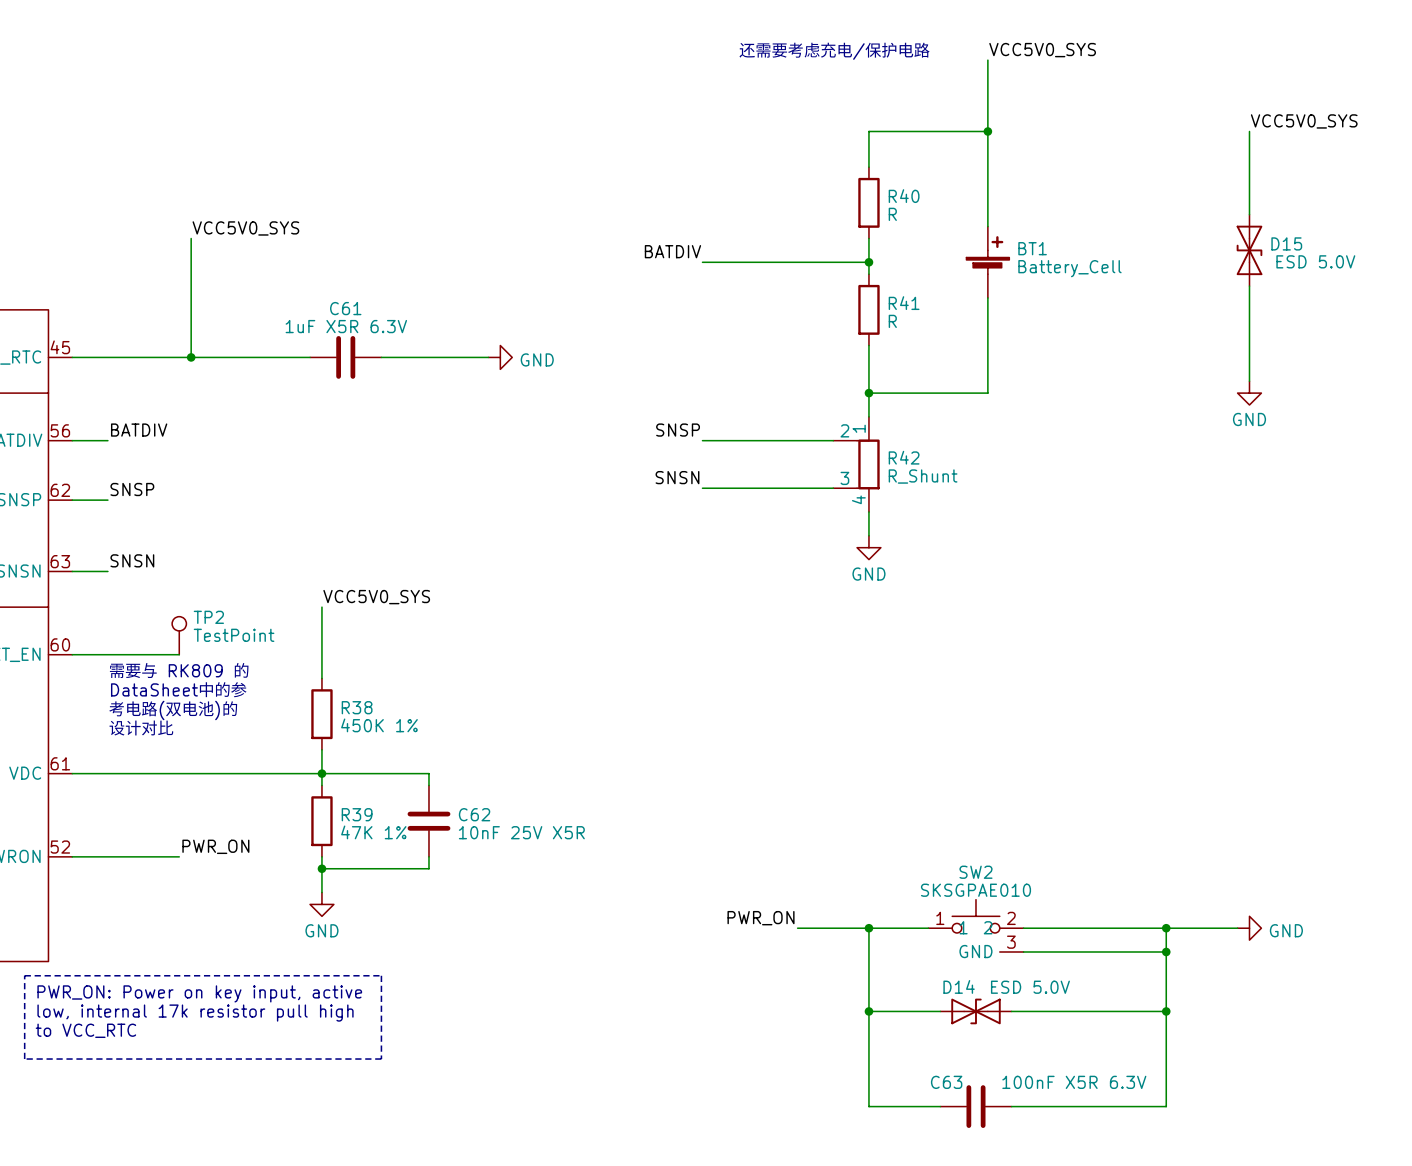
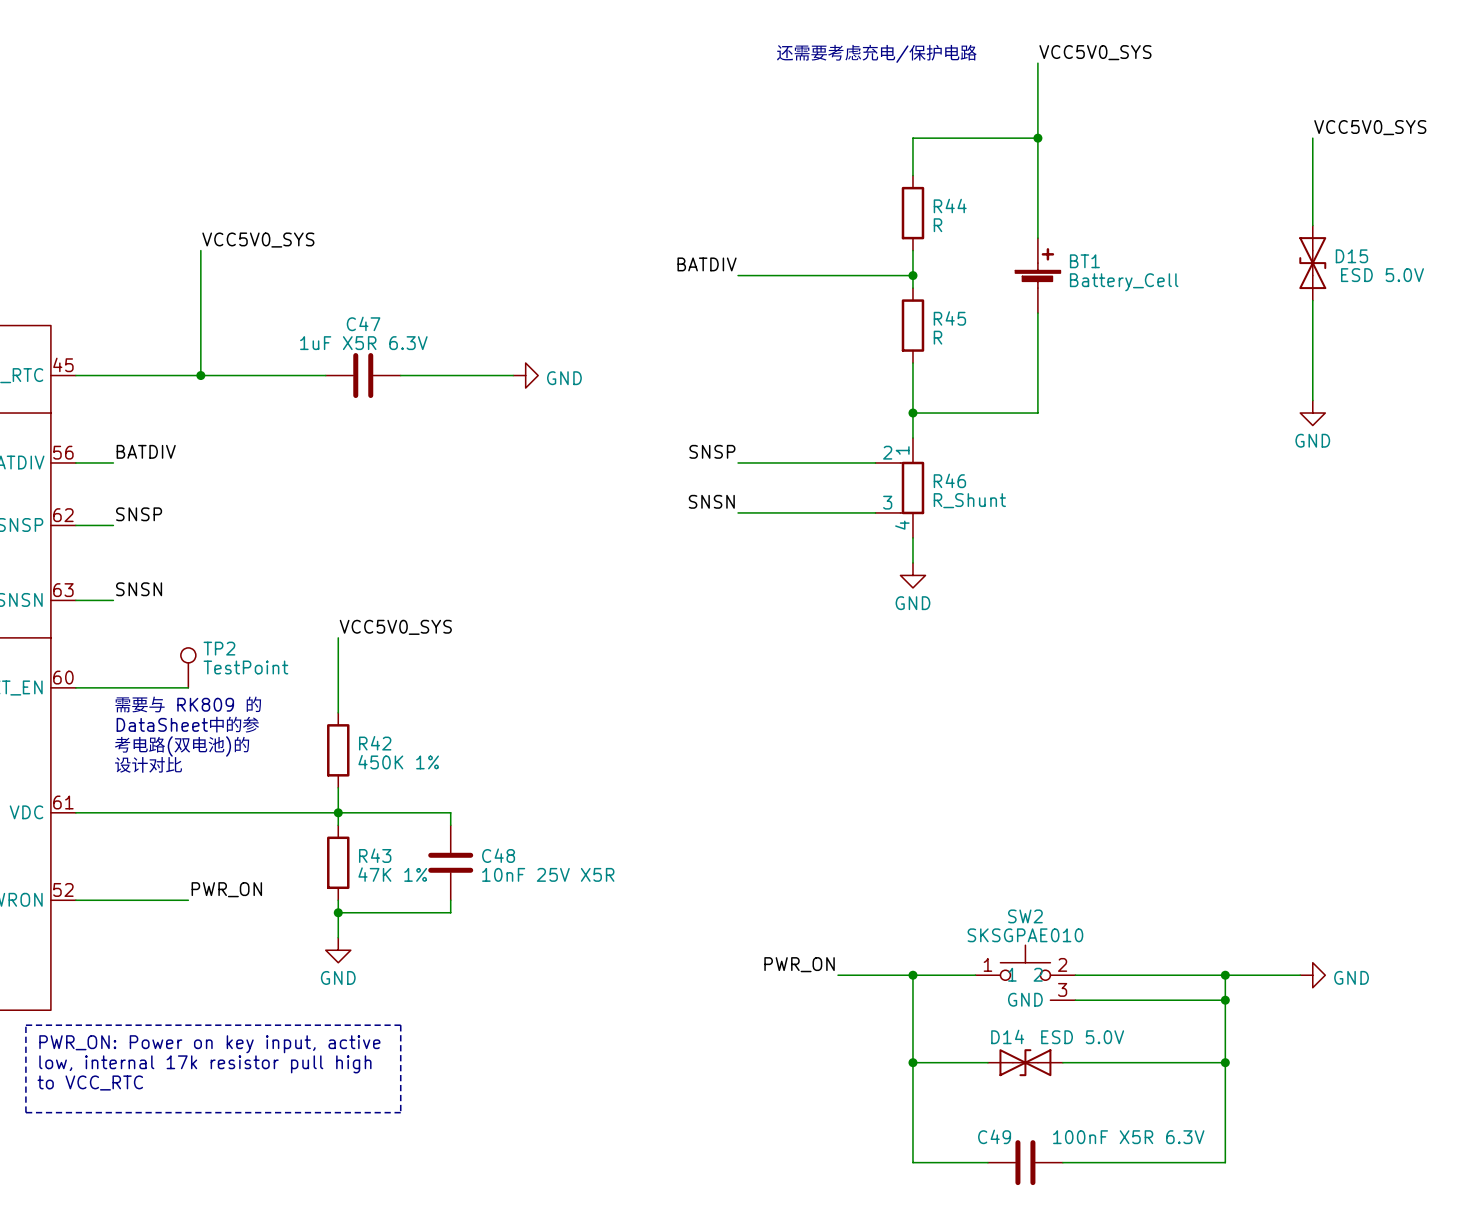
R40 name: R40 (904, 196) -> R44 (950, 206)
R41 name: R41 (904, 303) -> R45 (949, 318)
C61 name: C61 (345, 308) -> C47 (363, 323)
R42 name: R42 (904, 457) -> R46 (949, 480)
R38 name: R38 (357, 707) -> R42 (375, 743)
R39 name: R39 (357, 814) -> R43 (375, 855)
C62 name: C62 (474, 814) -> C48 (498, 855)
C63 name: C63 (946, 1082) -> C49 (994, 1136)

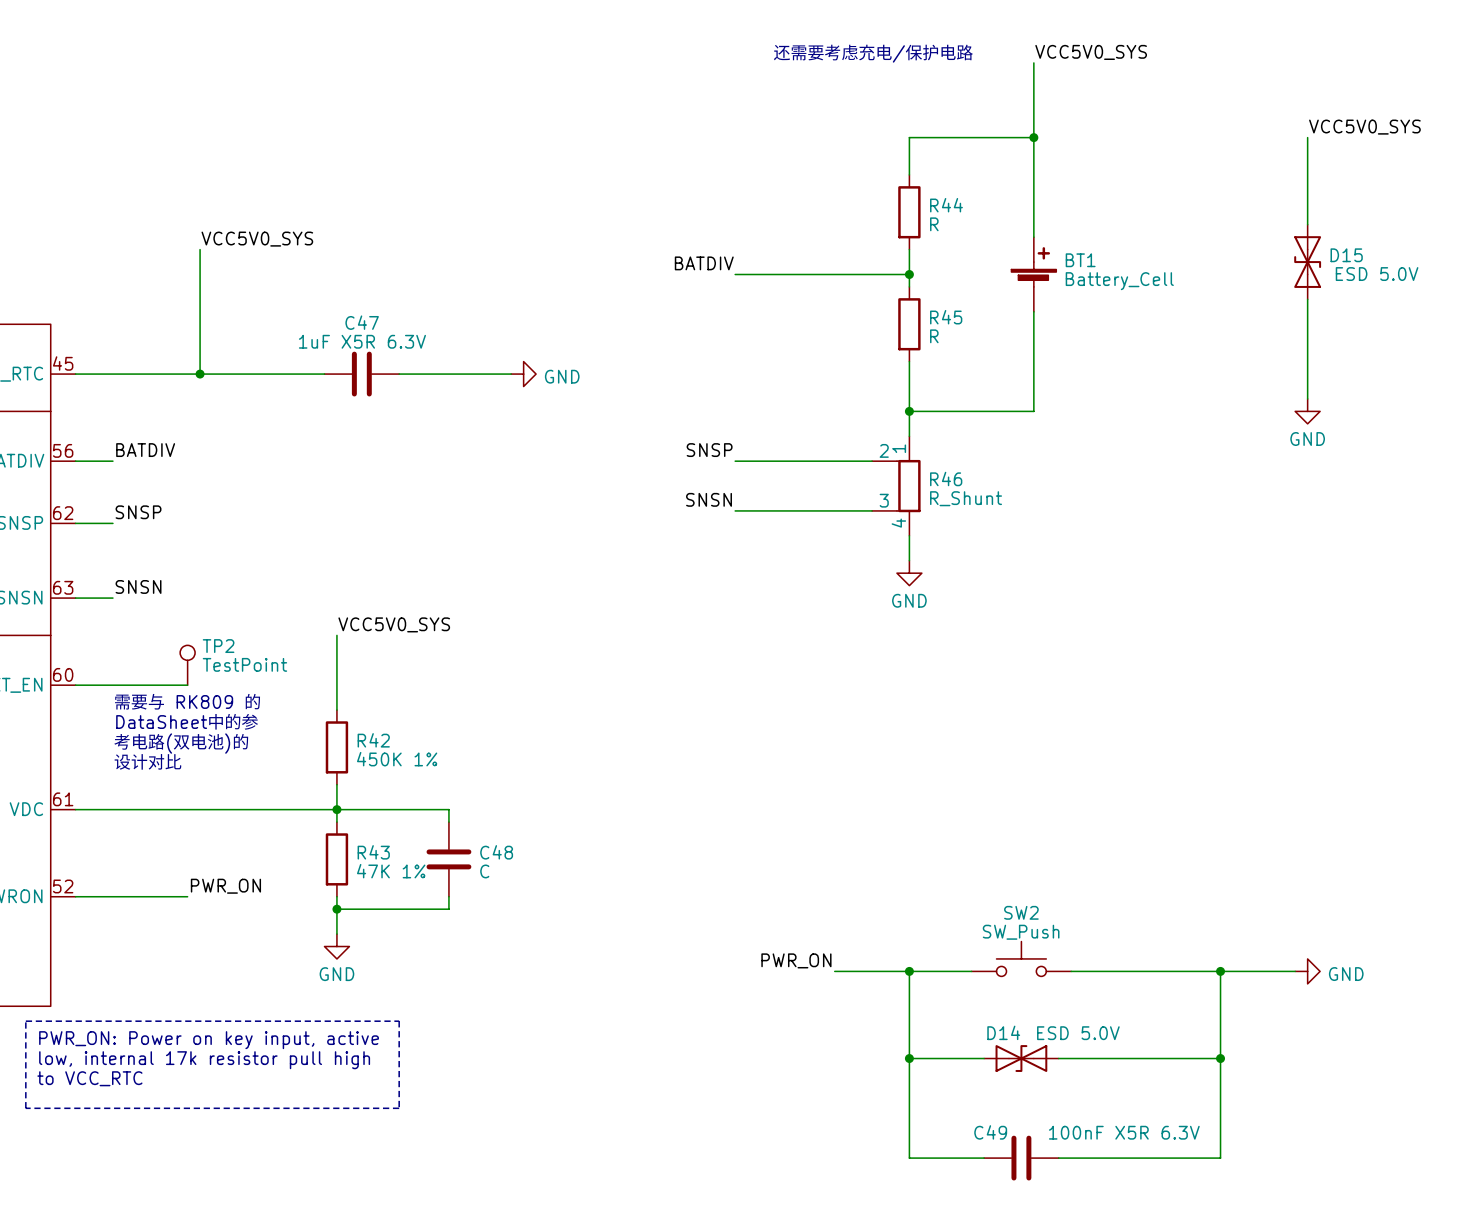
C48 value: 10nF 25V X5R (548, 874) -> C (484, 871)
SW2 value: SKSGPAE010 (1025, 935) -> SW_Push (1021, 932)
SW2 symbol: [975, 945, 1076, 1001] -> [971, 941, 1072, 977]
wire: (1075, 1000) (1225, 1000) -> none
junction: (1225, 1000) -> none

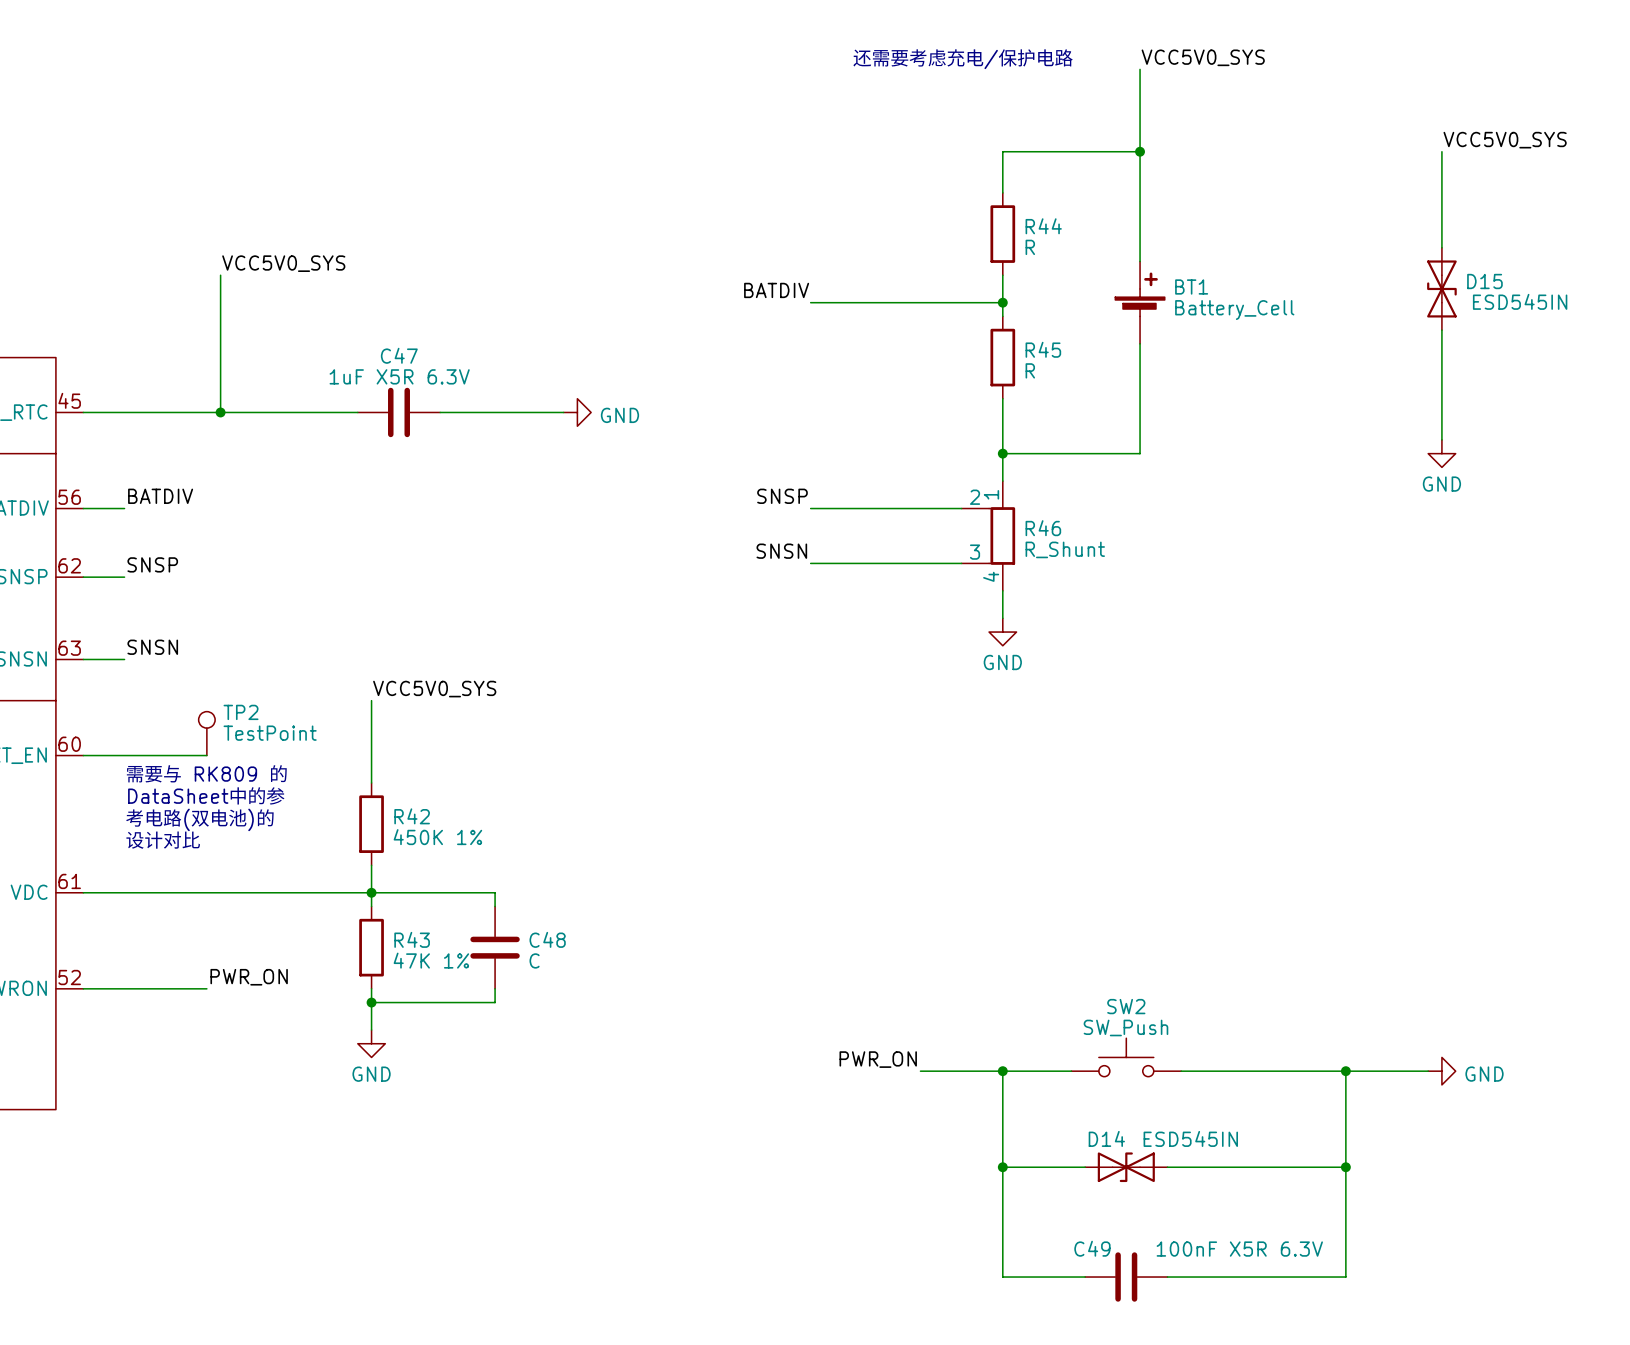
D15 value: ESD 5.0V (1377, 274) -> ESD545IN (1520, 301)
line: (25, 1021) (399, 1021) (399, 1108) (25, 1108) (25, 1021) -> none
D14 value: ESD 5.0V (1078, 1033) -> ESD545IN (1190, 1138)
text: PWR_ON: Power on key input, active (209, 1040) -> none
text: low, internal 17k resistor pull high (204, 1060) -> none
text: to VCC_RTC (89, 1078) -> none

